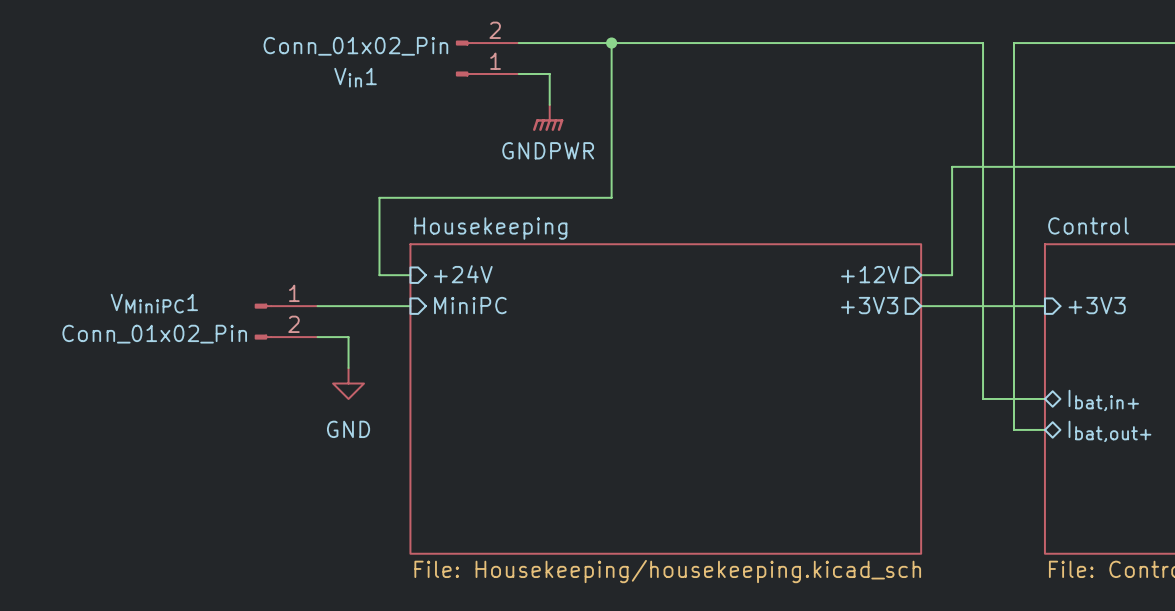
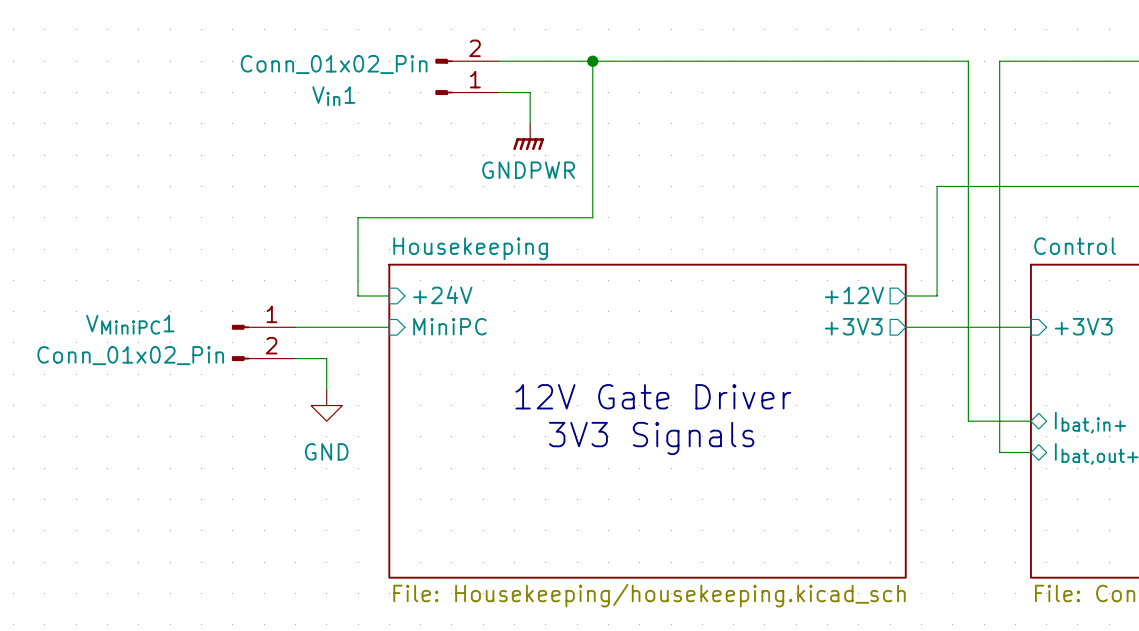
text: none -> 12V Gate Driver (653, 396)
text: none -> 3V3 Signals (651, 438)

